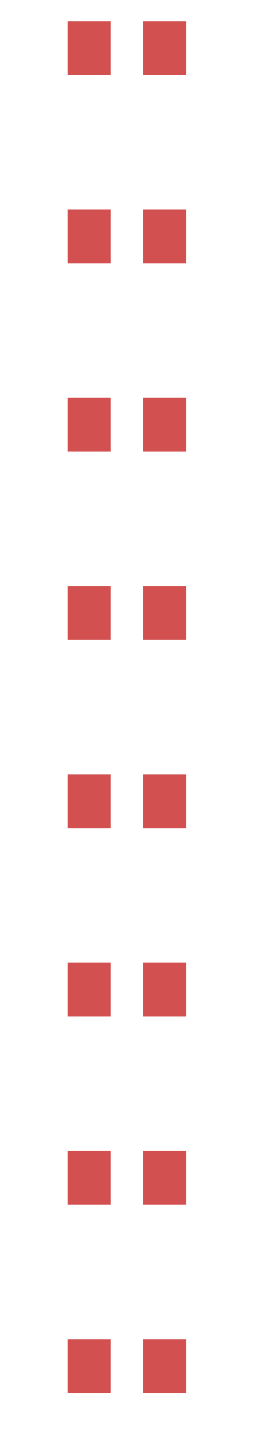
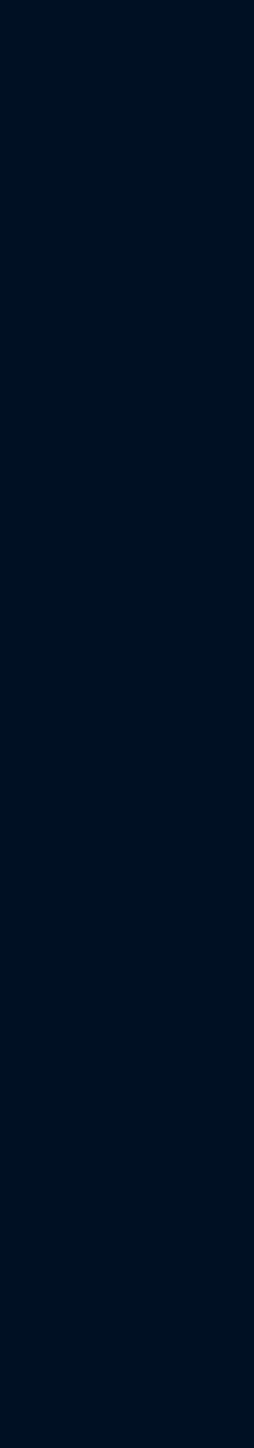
part: (126, 48) -> none
part: (126, 236) -> none
part: (126, 424) -> none
part: (126, 612) -> none
part: (126, 801) -> none
part: (126, 989) -> none
part: (126, 1177) -> none
part: (126, 1366) -> none

